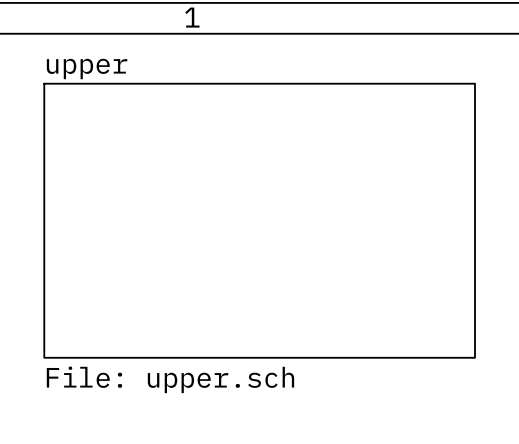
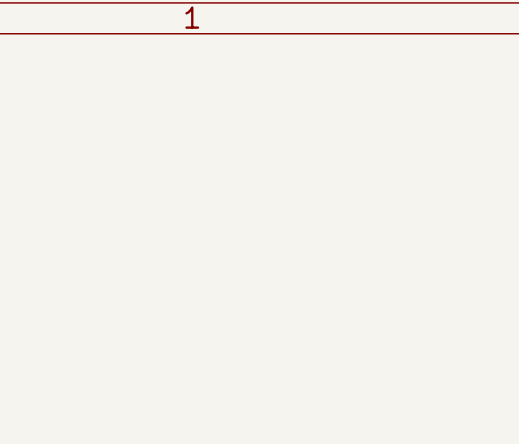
sheet upper: File: upper.sch (259, 220) -> none

